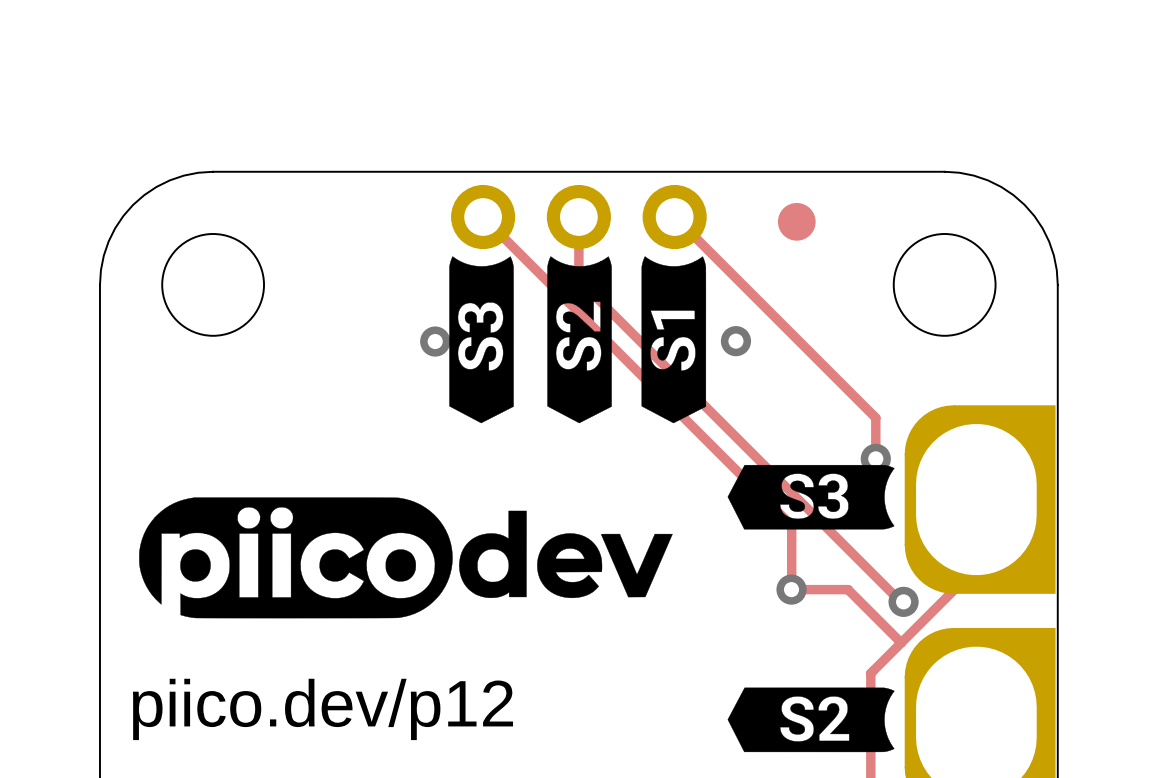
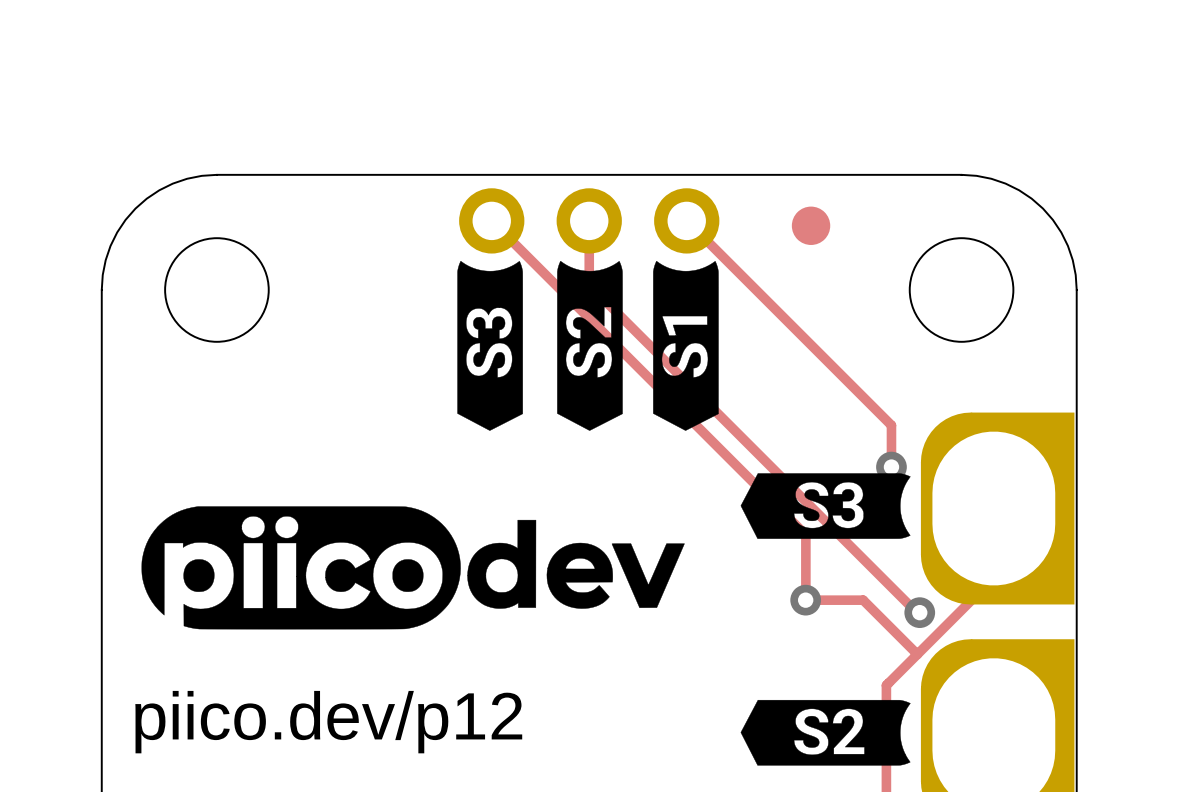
via: (435, 341) -> none
via: (735, 341) -> none

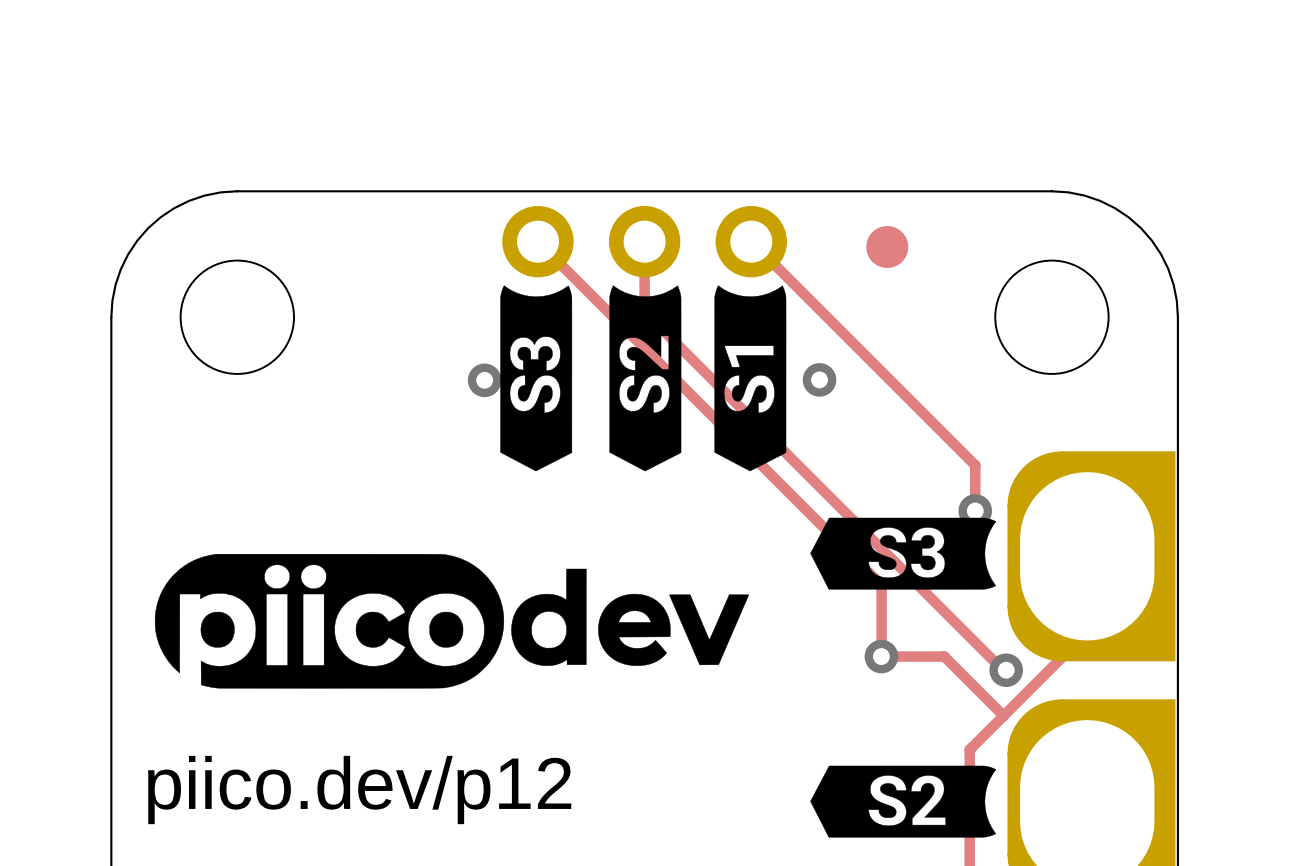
via: none -> (484, 380)
via: none -> (819, 379)

